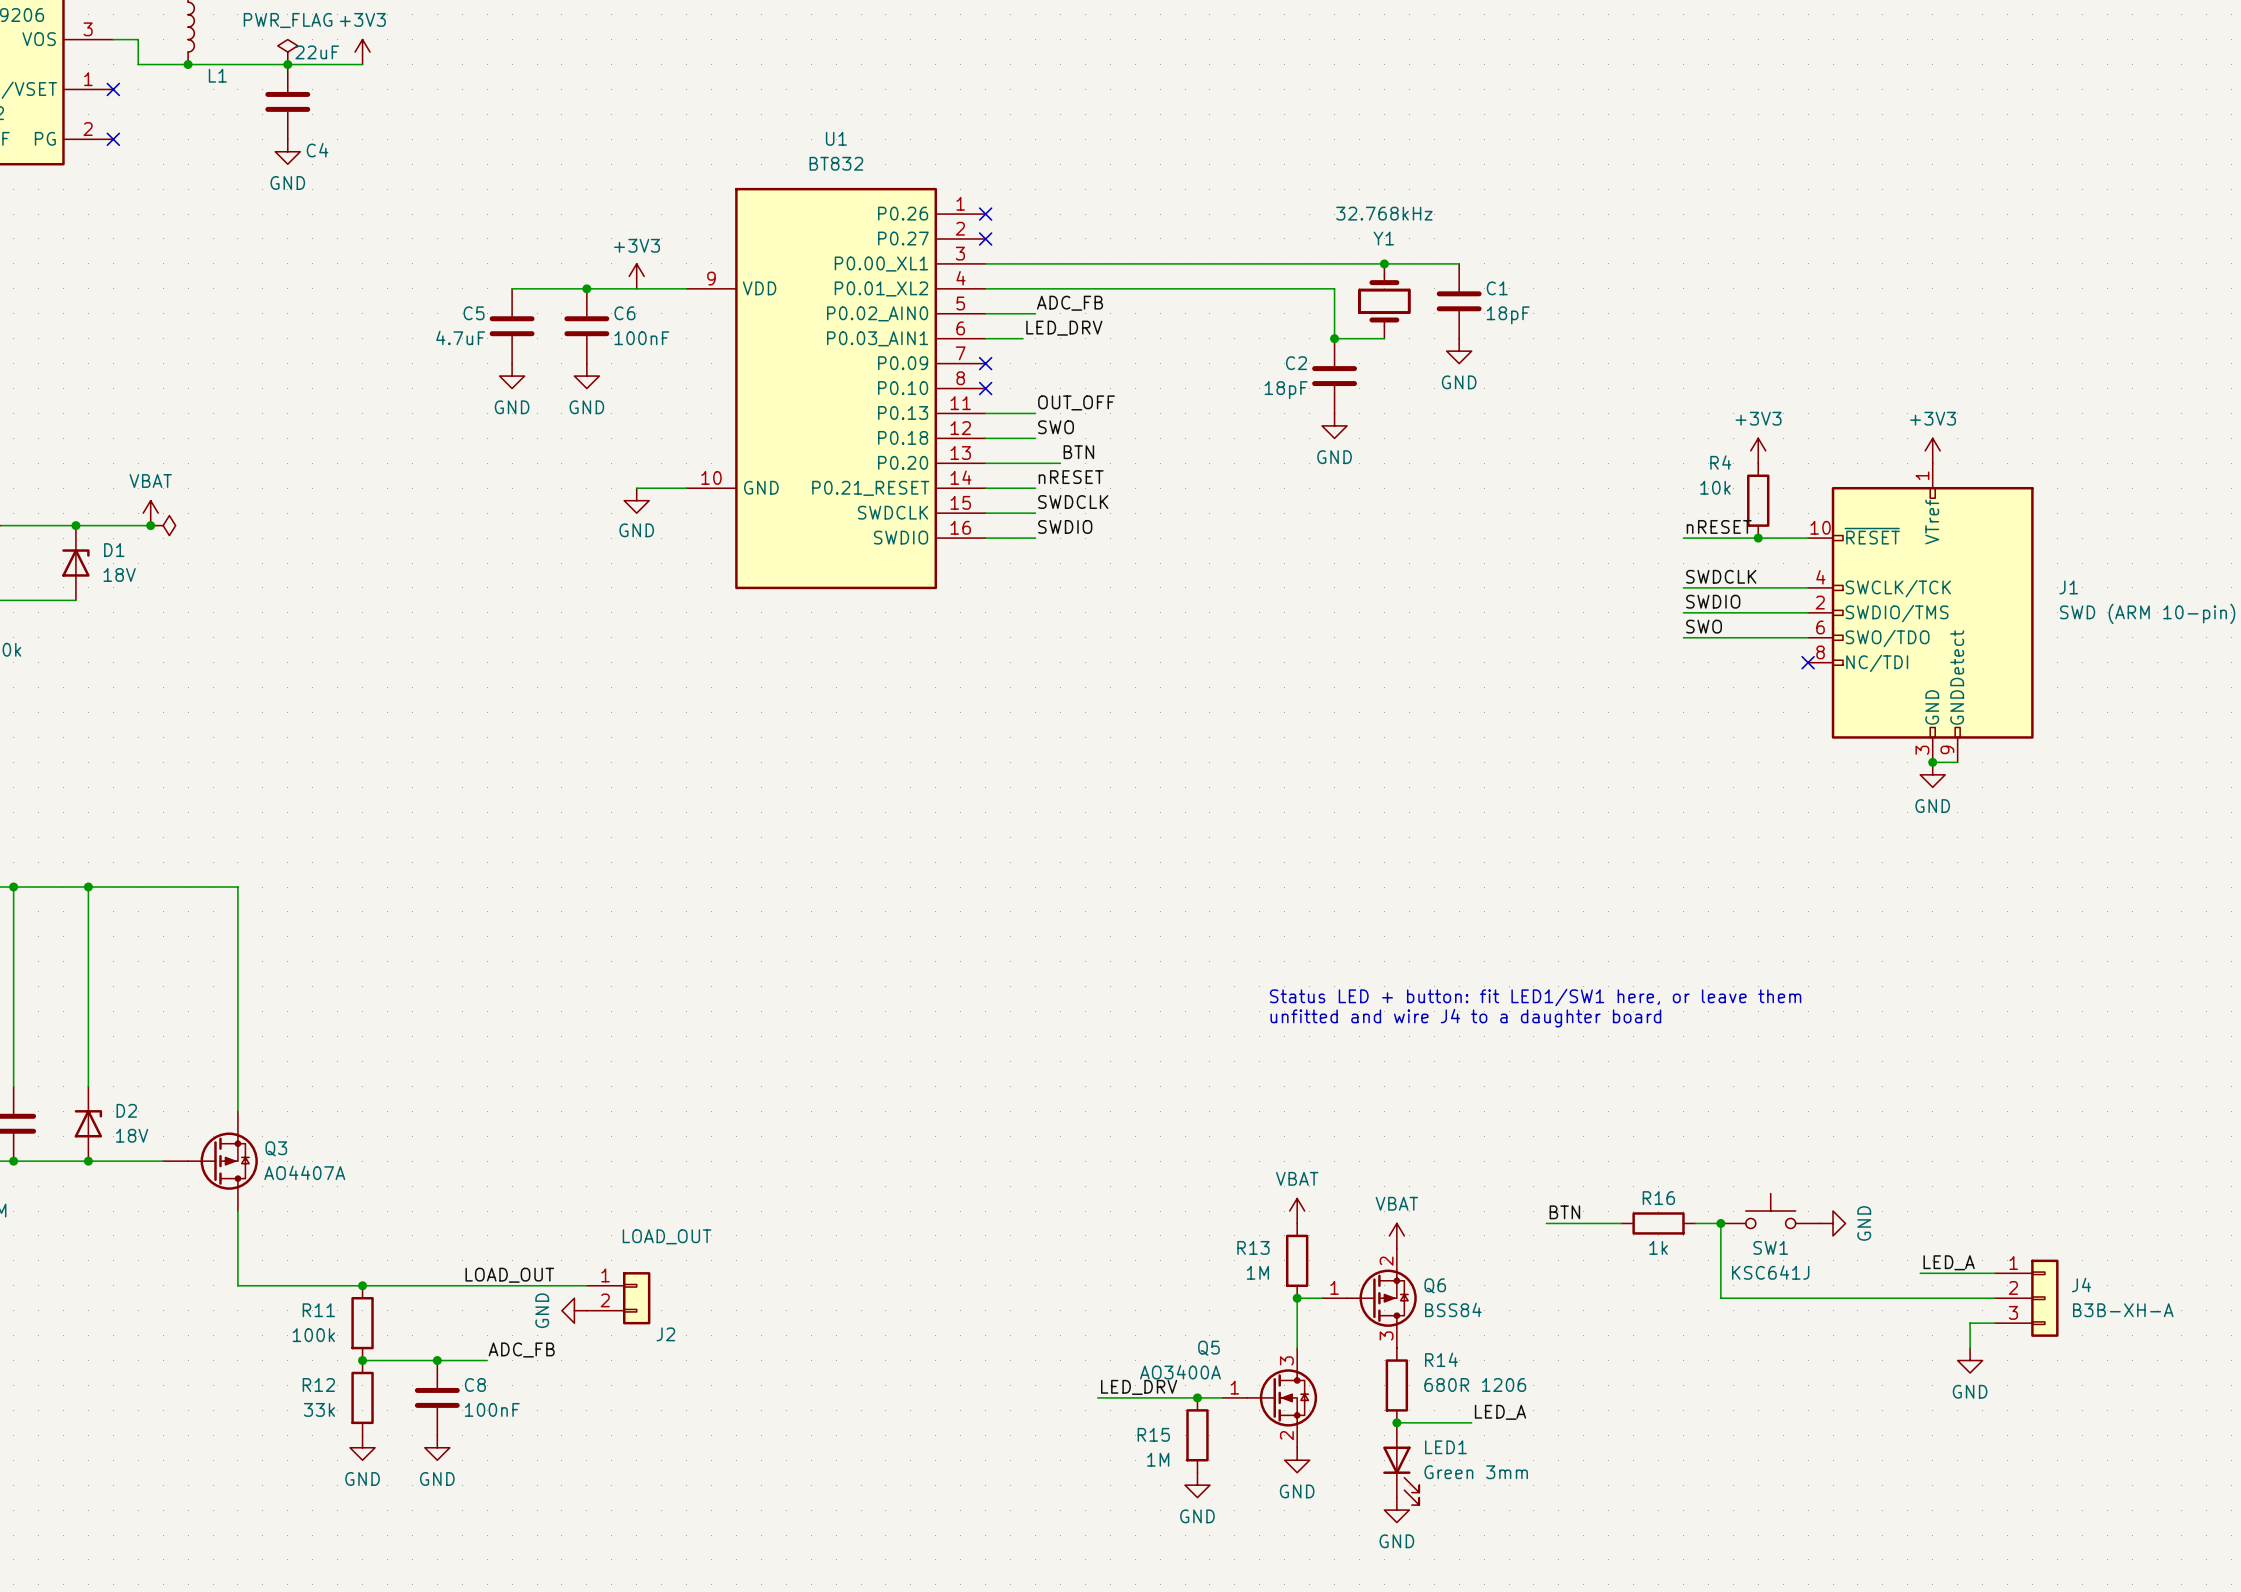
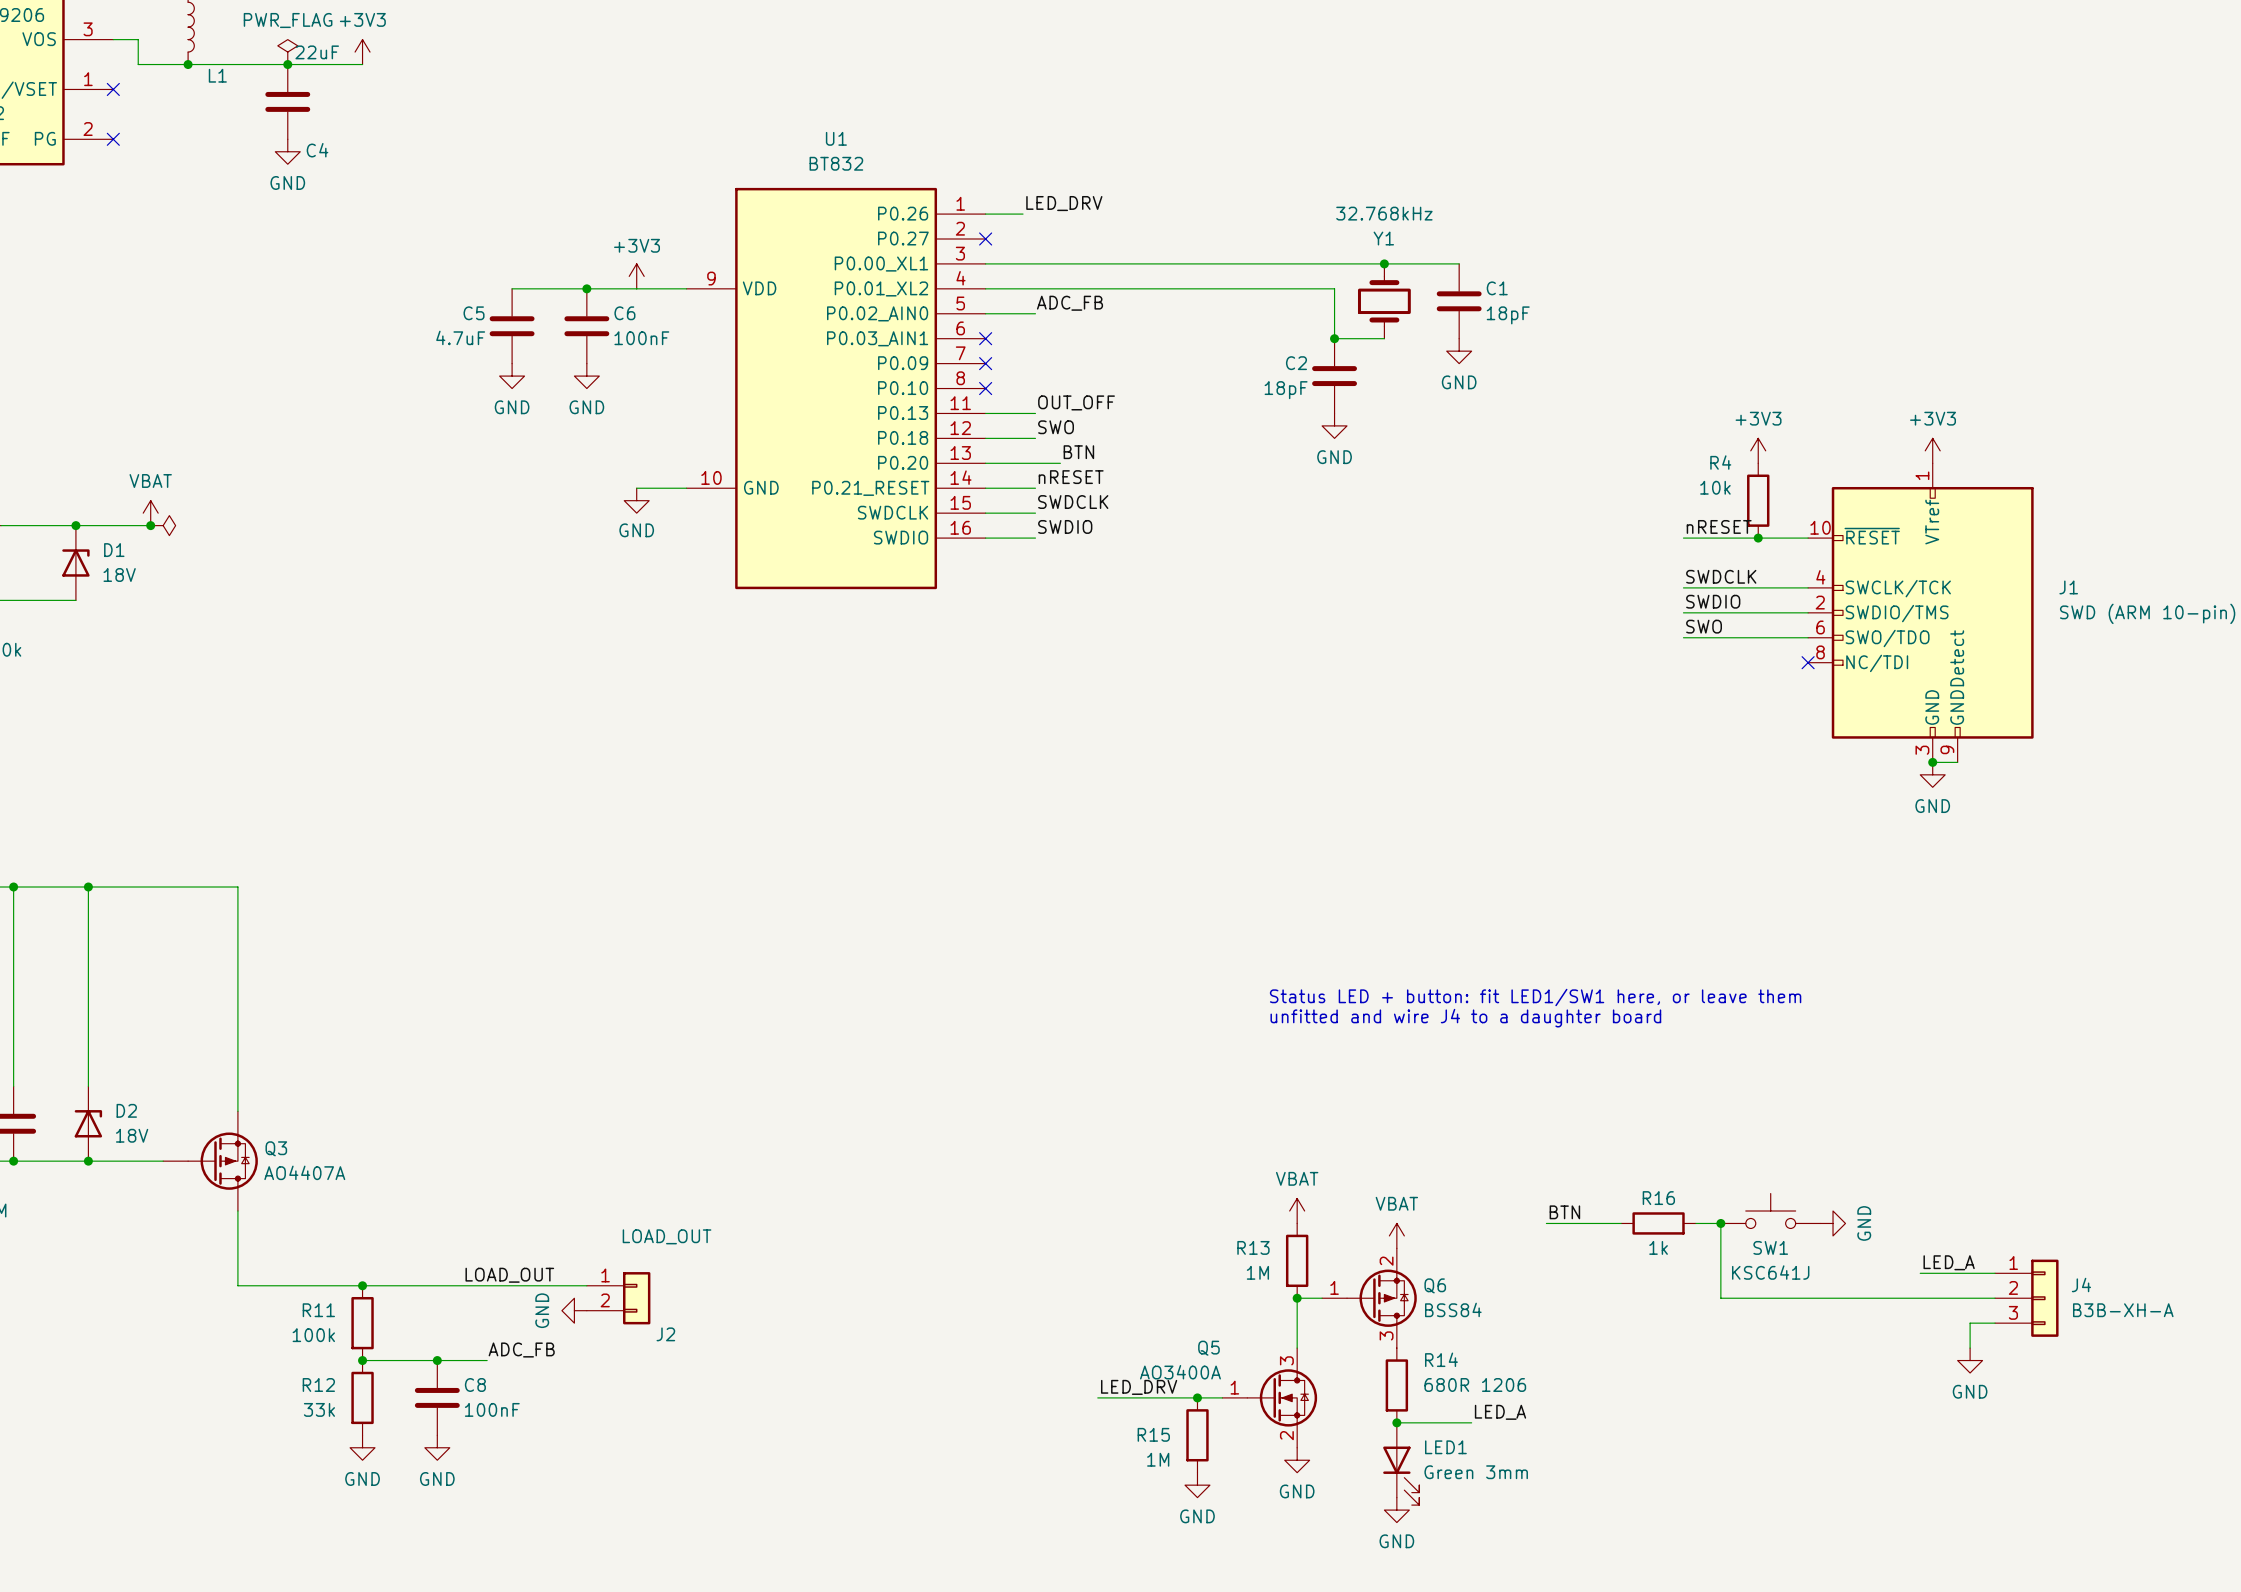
no-connect mark: (985, 214) -> none
label position: LED_DRV (1064, 328) -> LED_DRV (1064, 203)
wire: (985, 338) (1023, 338) -> (985, 214) (1023, 214)
no-connect mark: none -> (985, 338)

